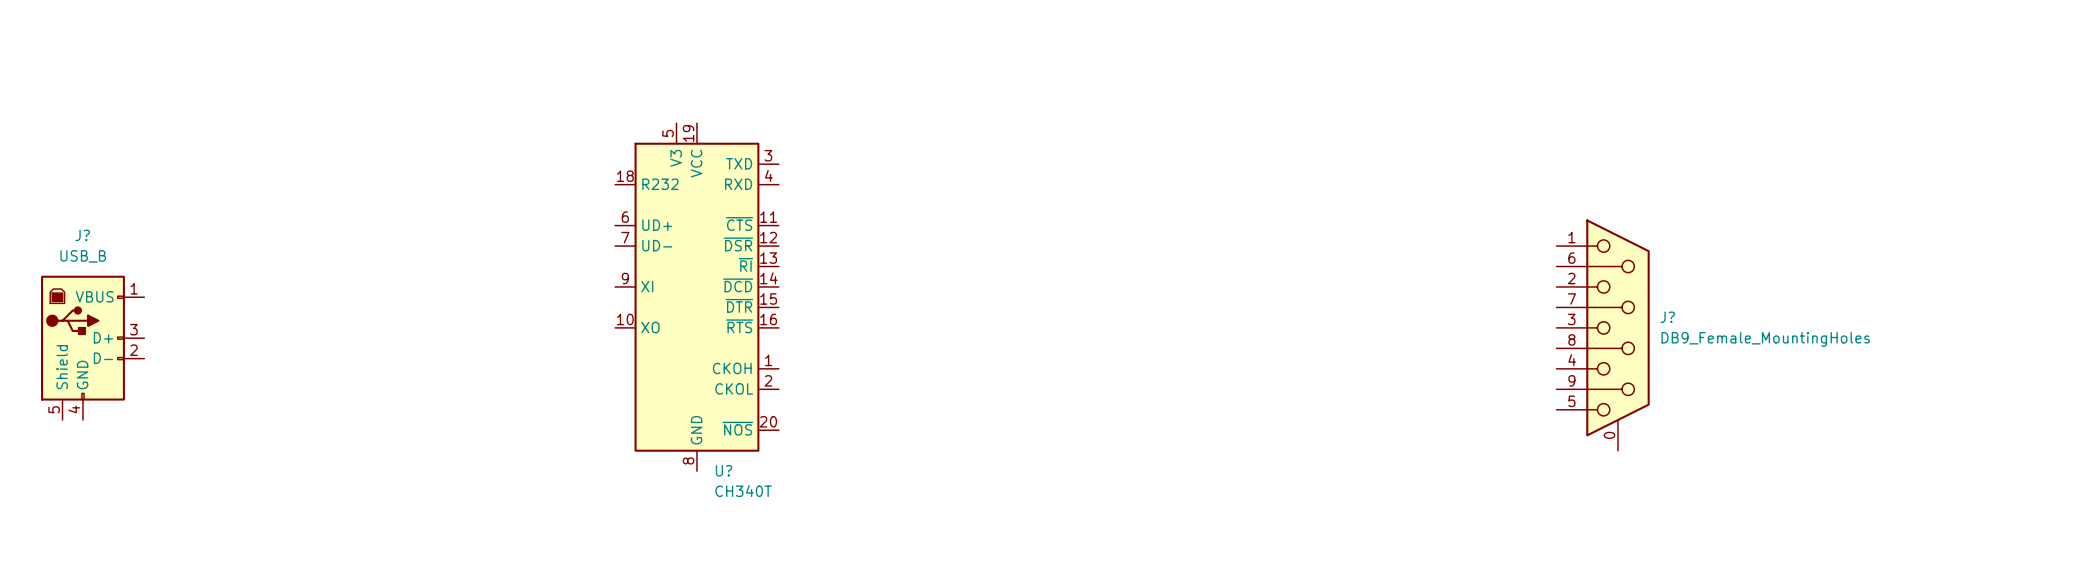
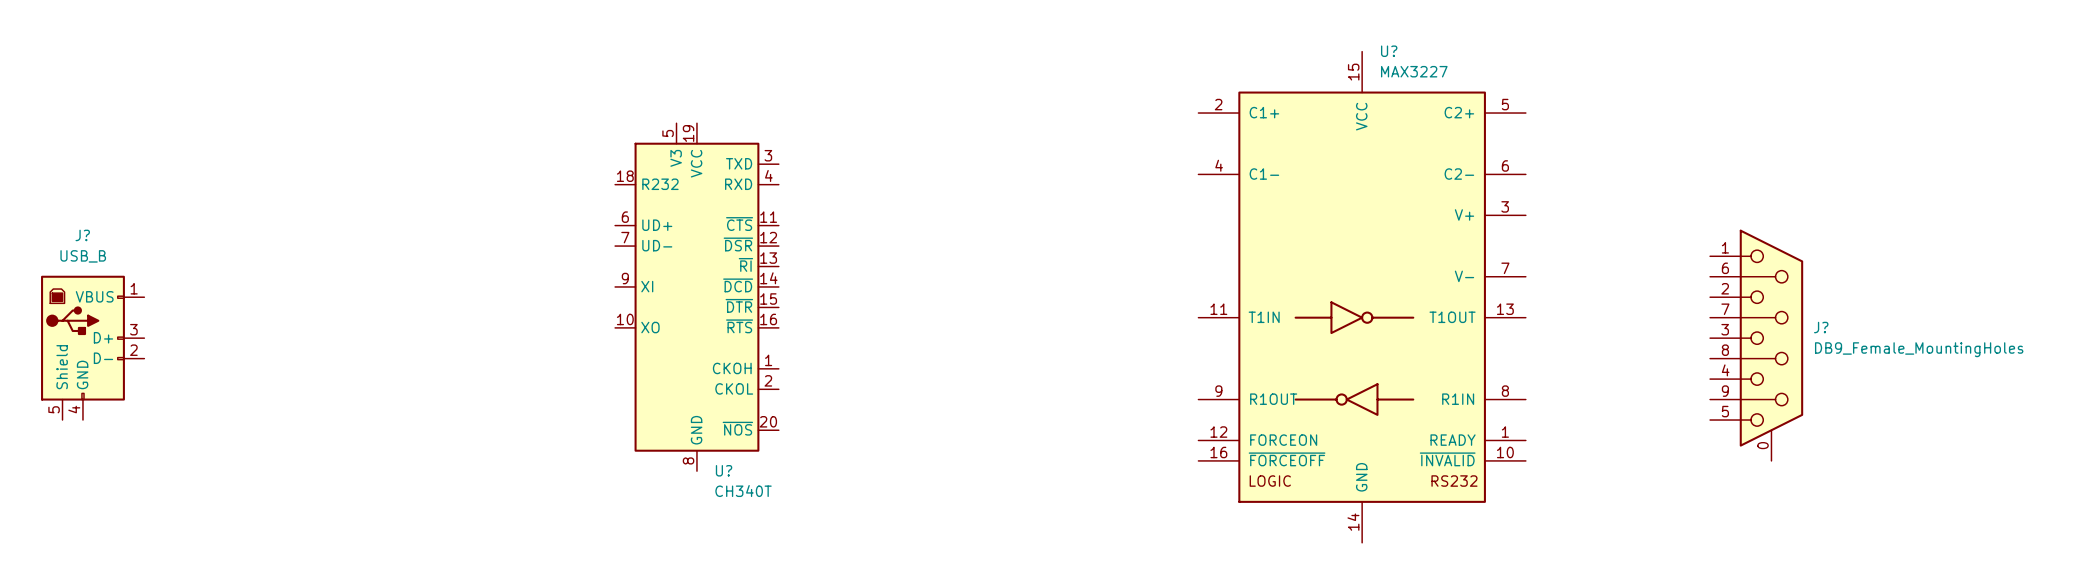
U?: none -> MAX3227 (1362, 297)
J? position: (1603, 335) -> (1756, 345)

